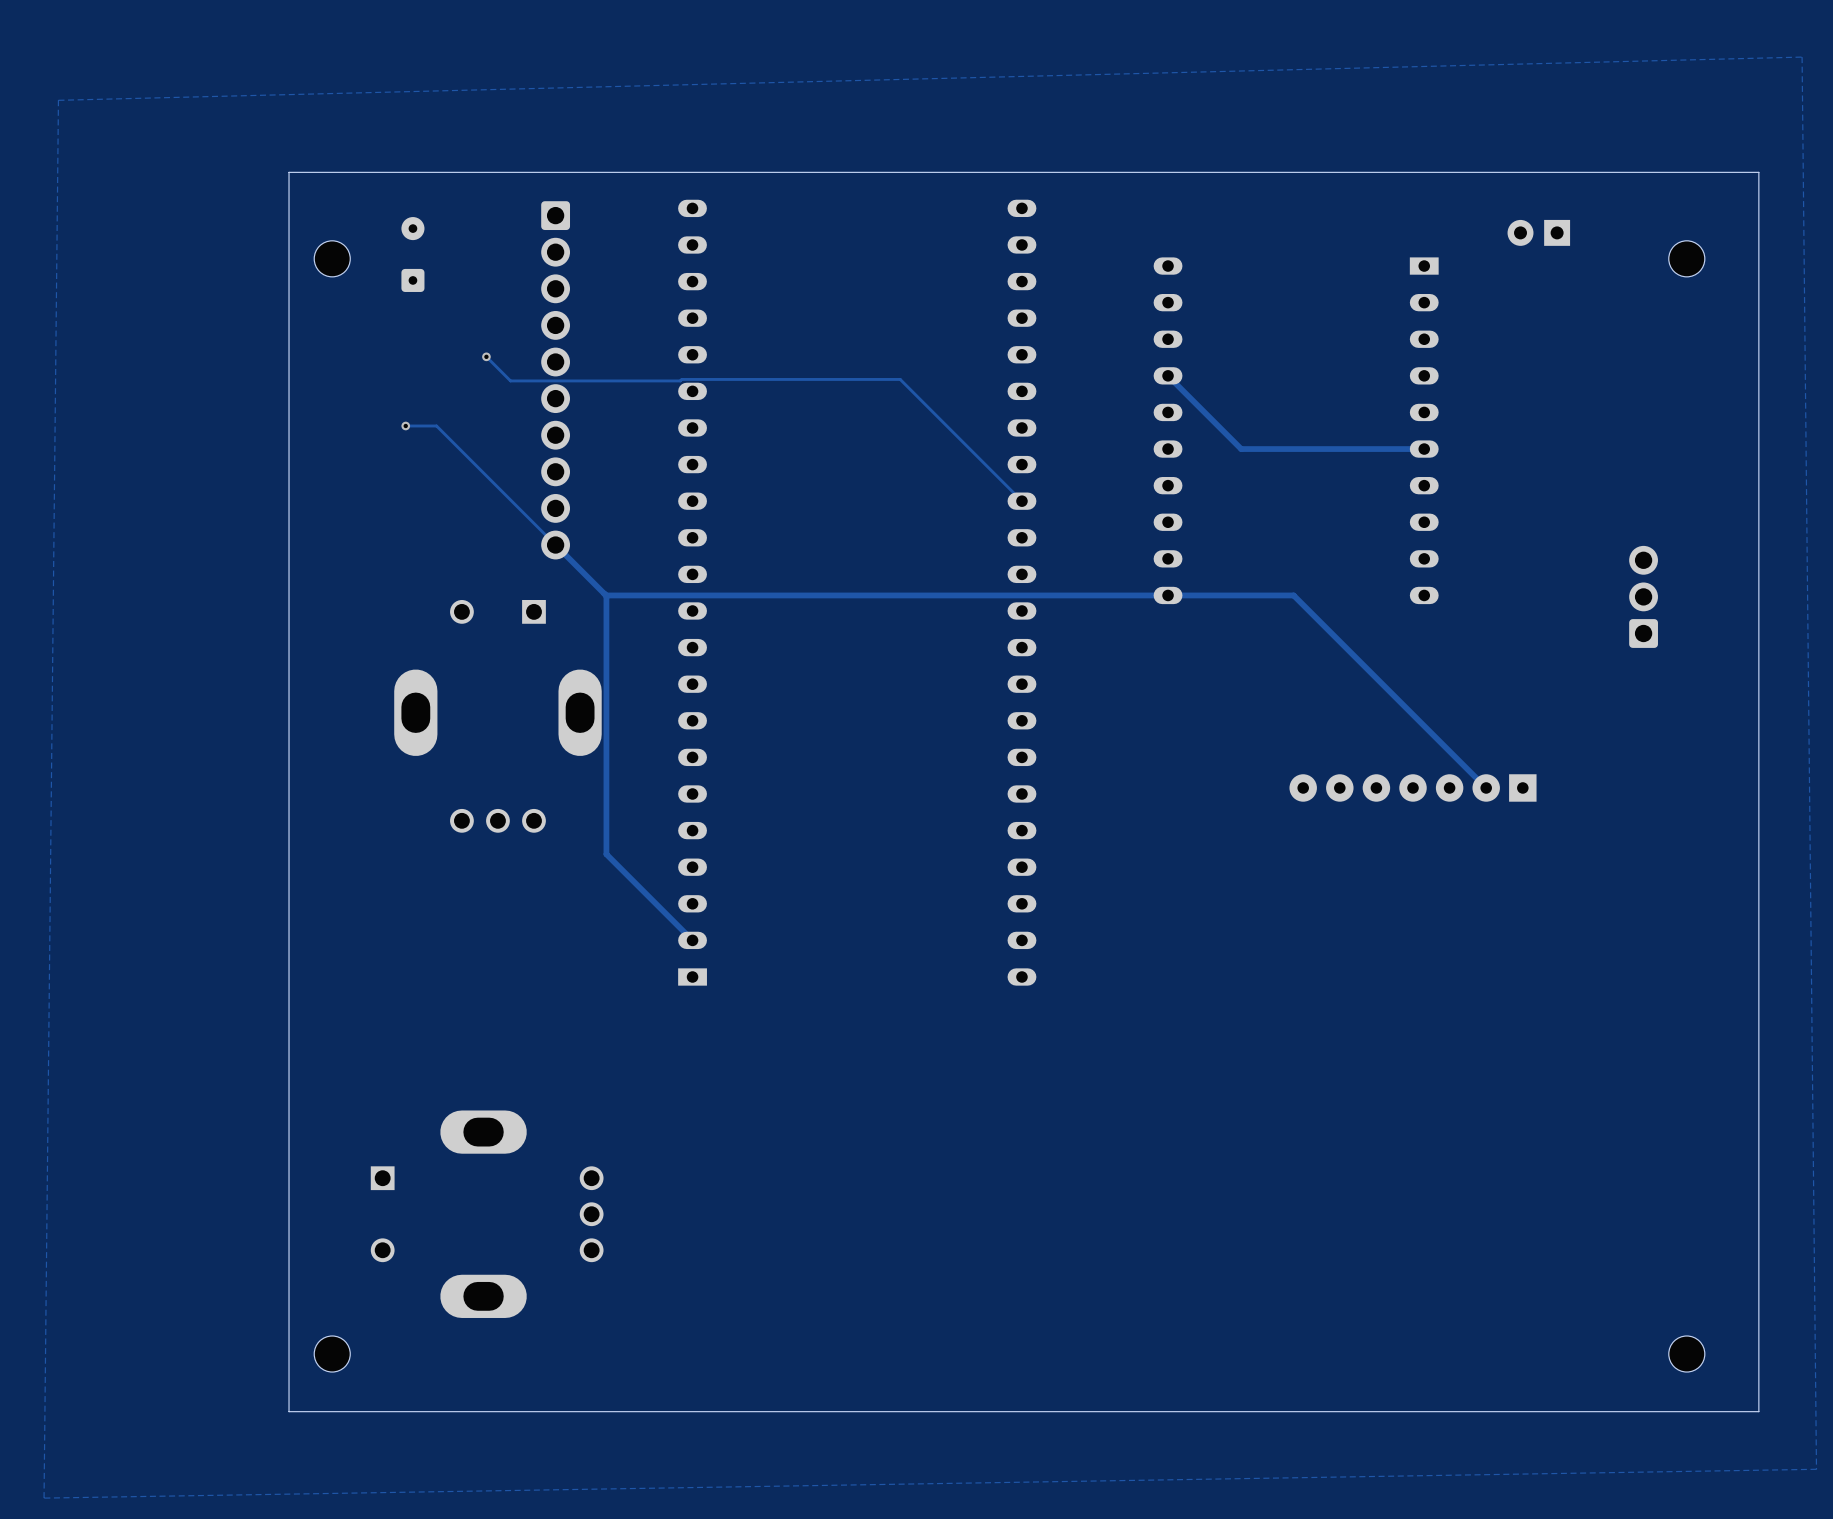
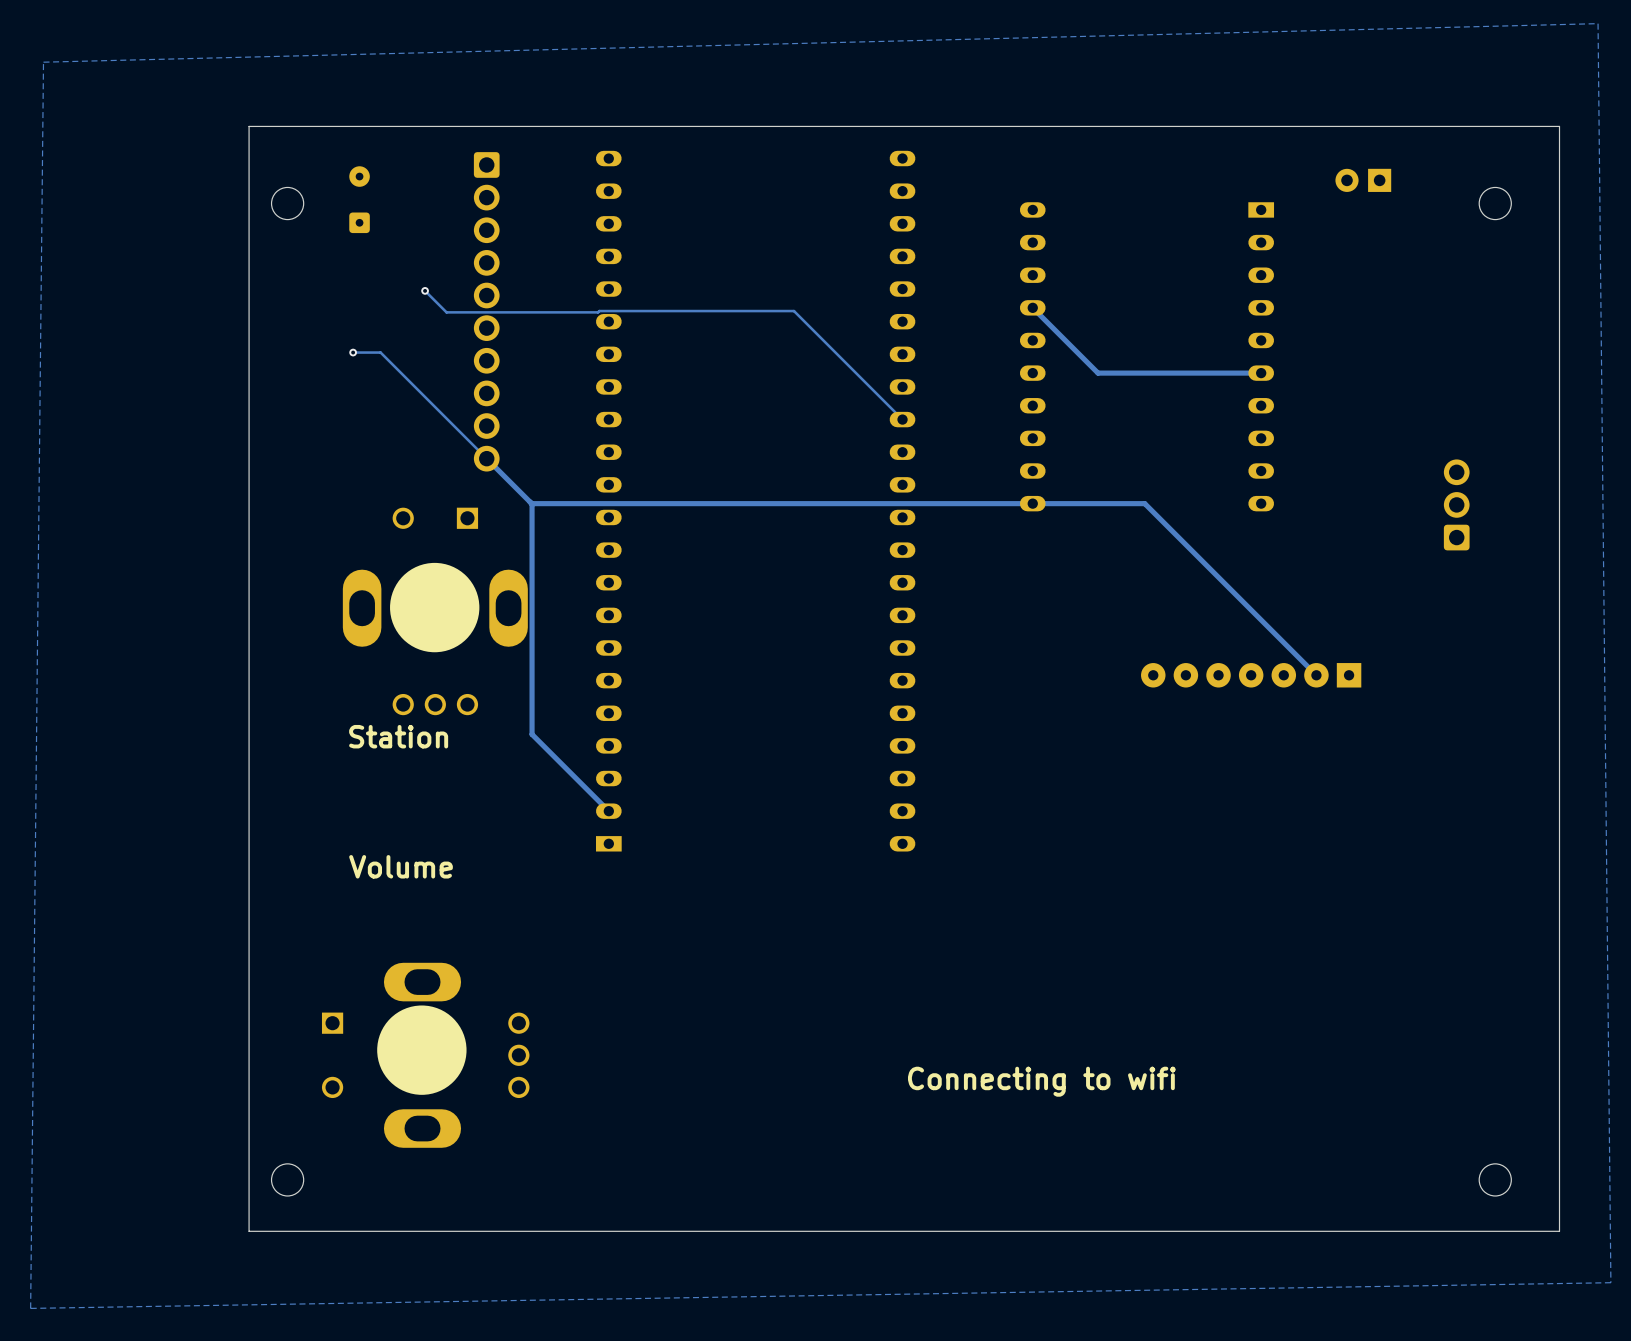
drawing: none -> [390, 562, 480, 653]
text: none -> Station (398, 736)
text: none -> Volume (401, 866)
drawing: none -> [377, 1005, 467, 1095]
text: none -> Connecting to wifi (1041, 1081)

